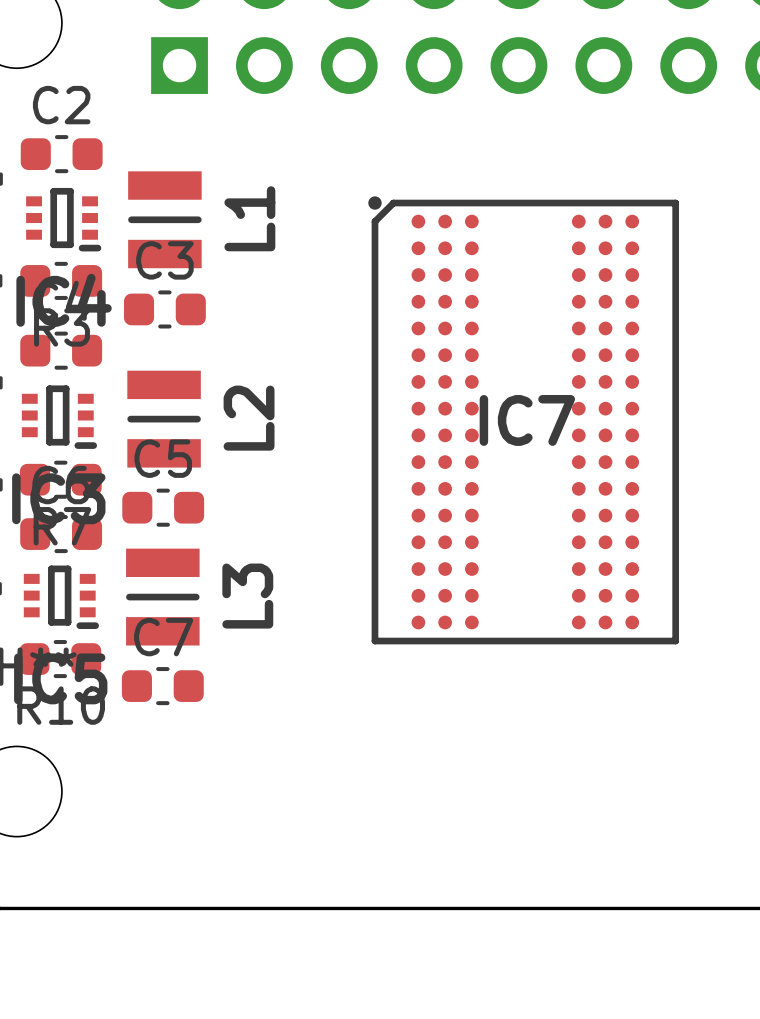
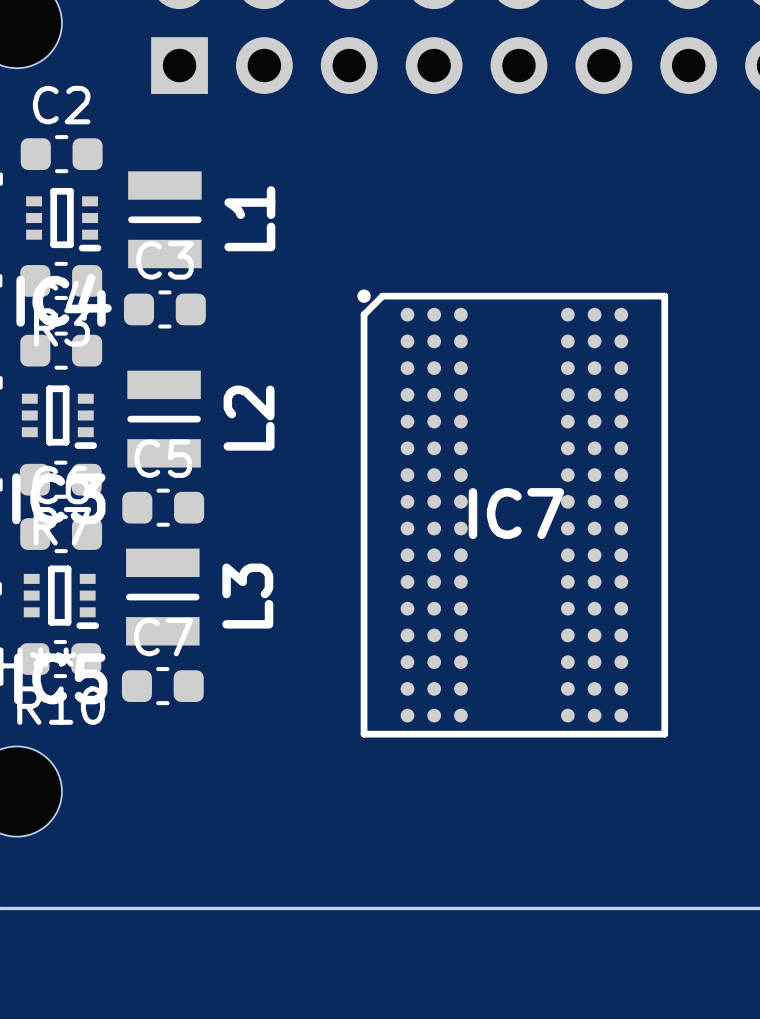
IC7 position: (523, 420) -> (512, 513)

